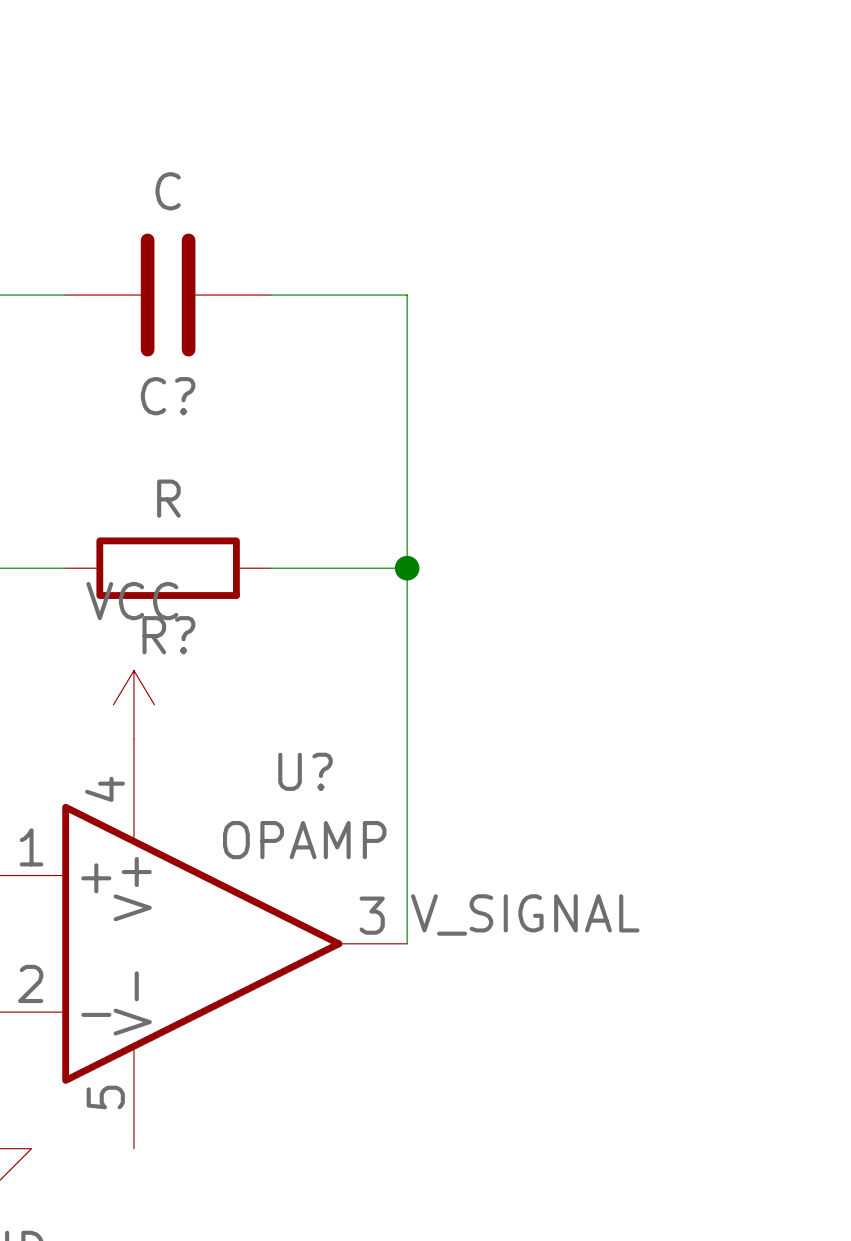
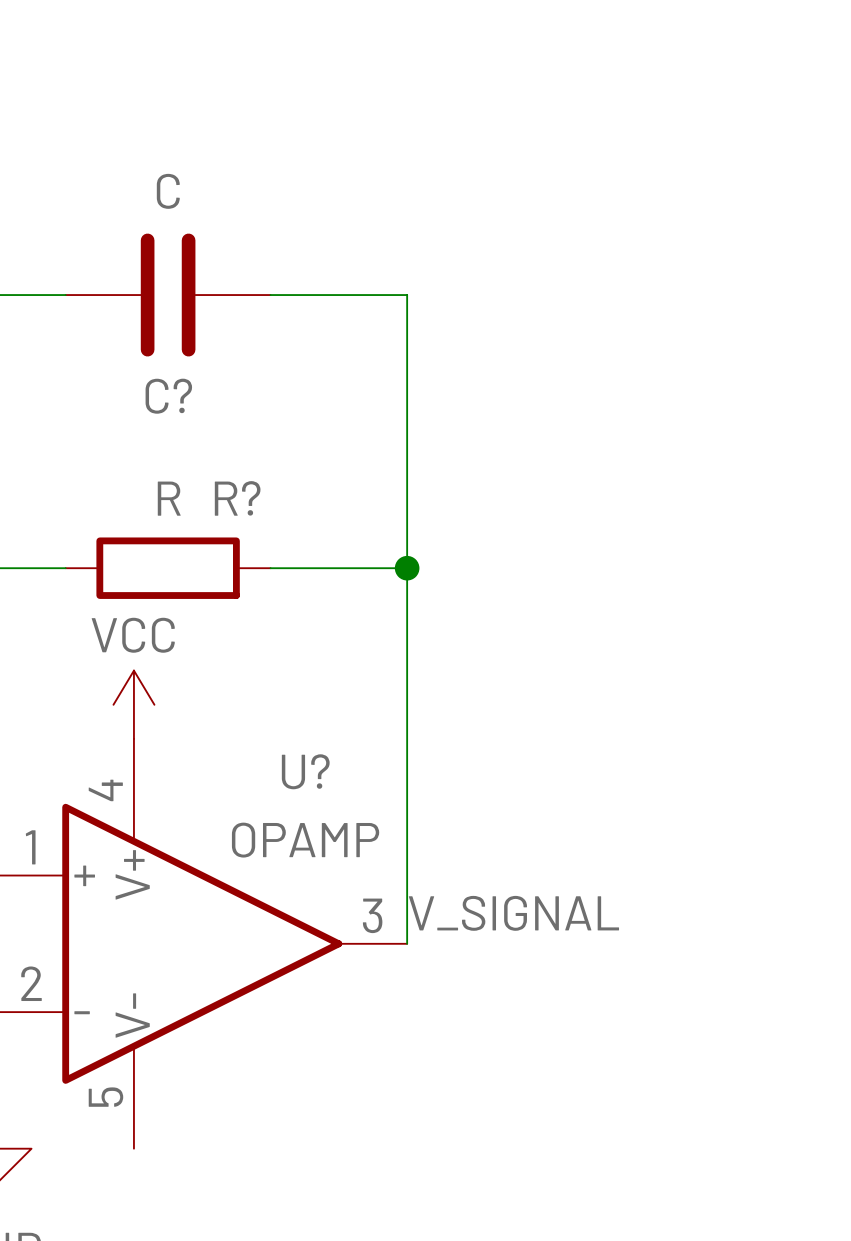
power symbol text position: VCC (132, 601) -> VCC (133, 635)
R? name position: R? (168, 635) -> R? (237, 498)

